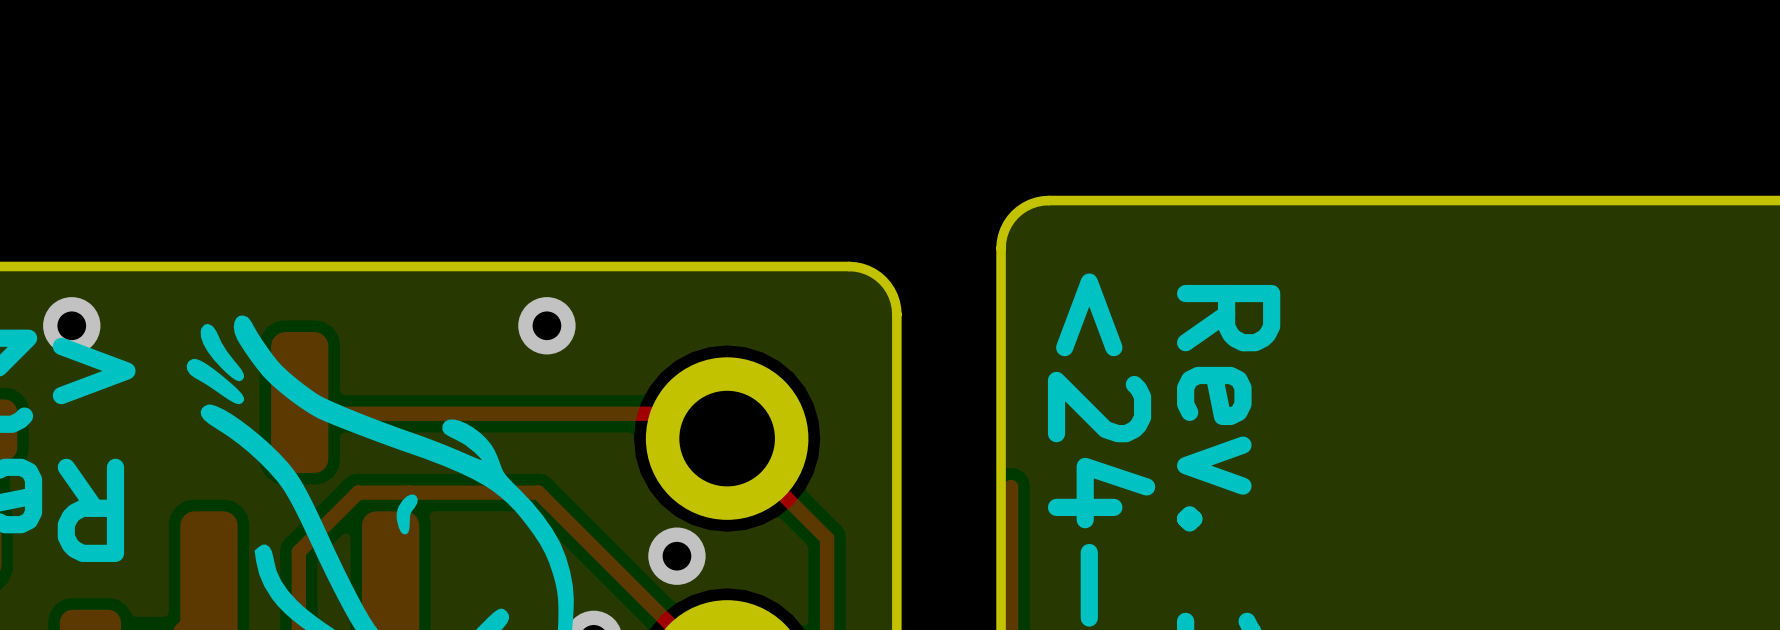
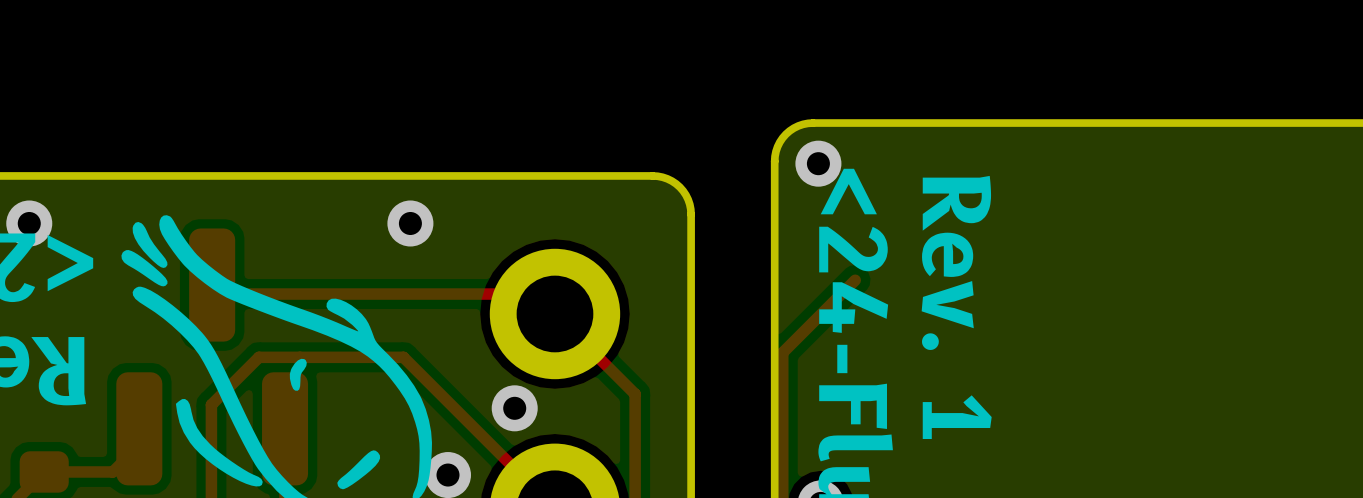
via: none -> (818, 163)
top track: none -> (855, 280) (782, 352)

